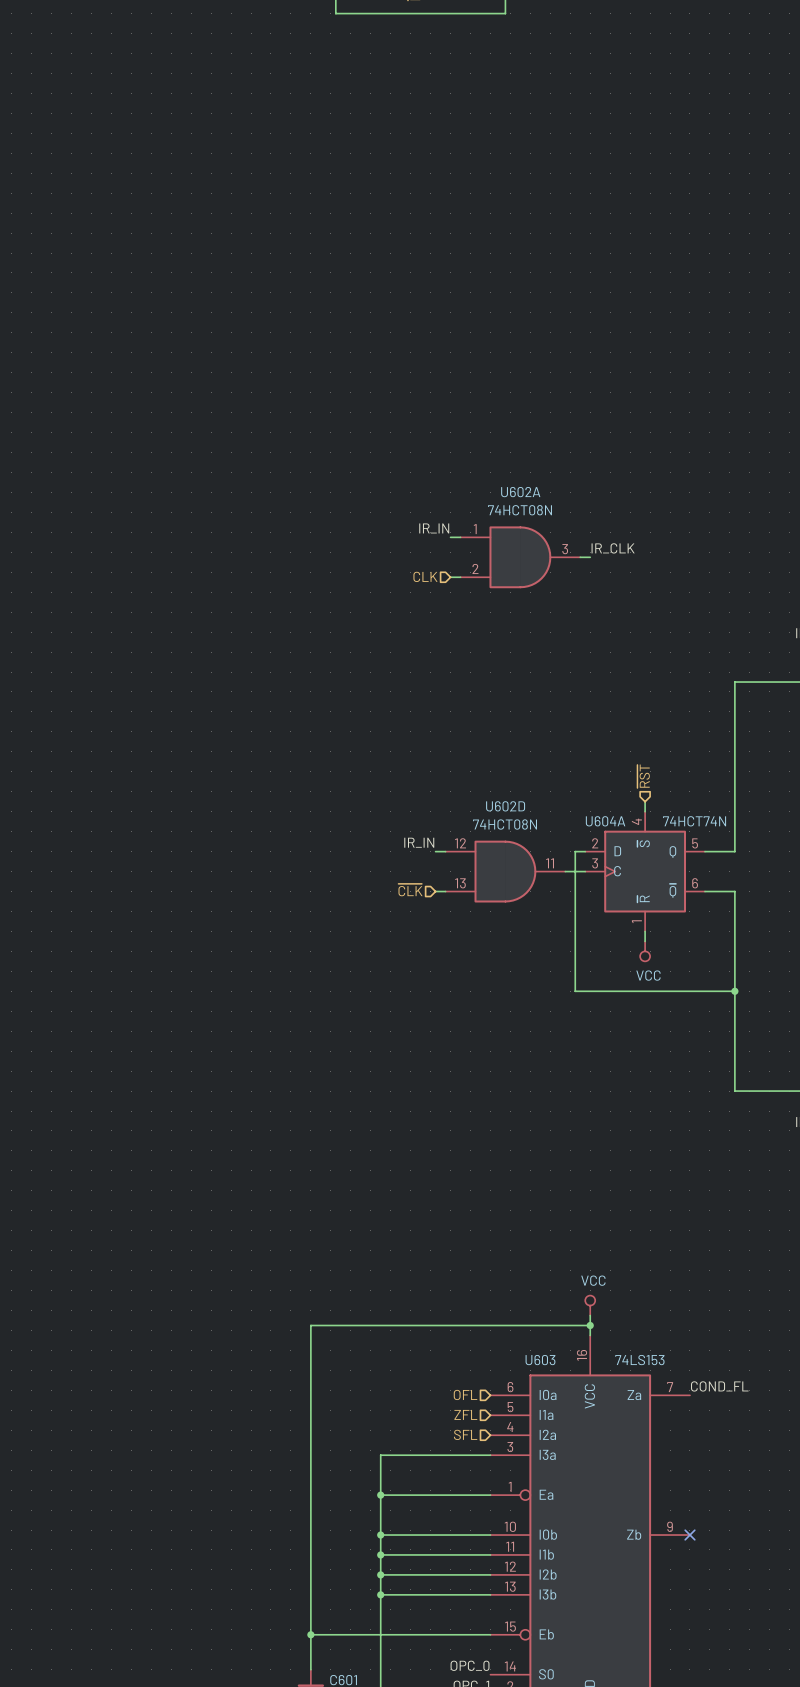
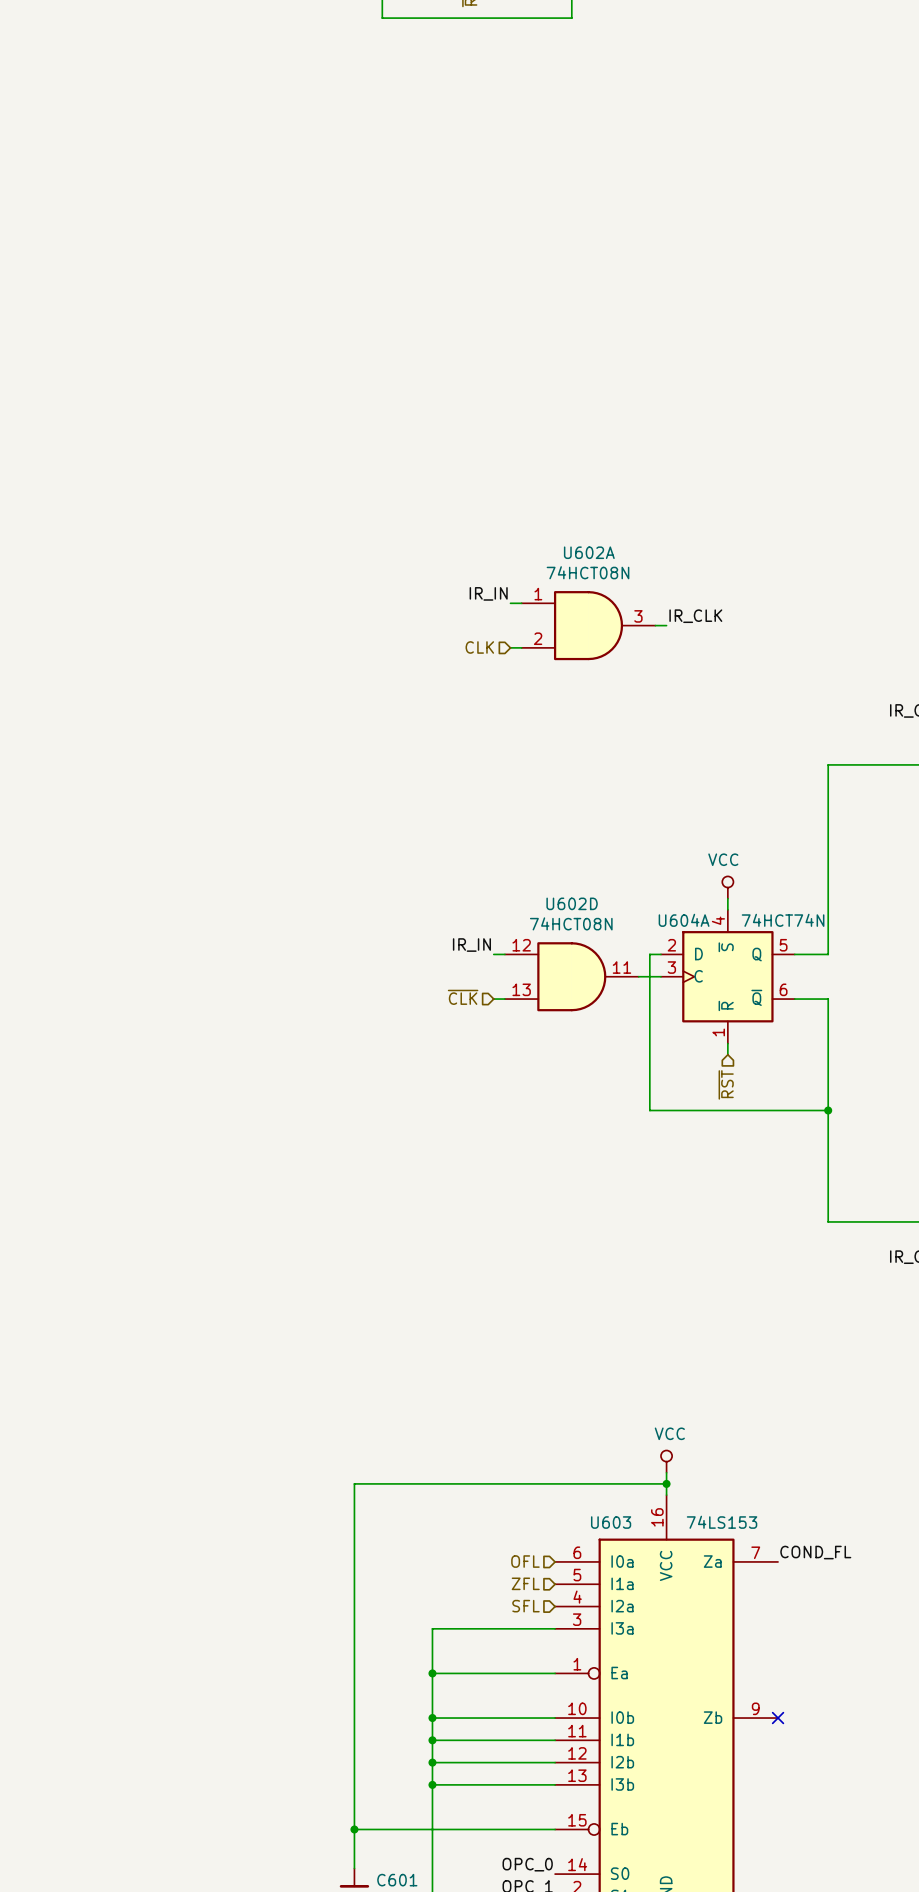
hierarchical label rotation: 0° (643, 776) -> 180° (726, 1084)
hierarchical label position: ~{RST} (643, 776) -> ~{RST} (726, 1084)
power symbol rotation: 0° (645, 951) -> 180° (727, 887)
power symbol position: VCC (645, 951) -> VCC (727, 887)

